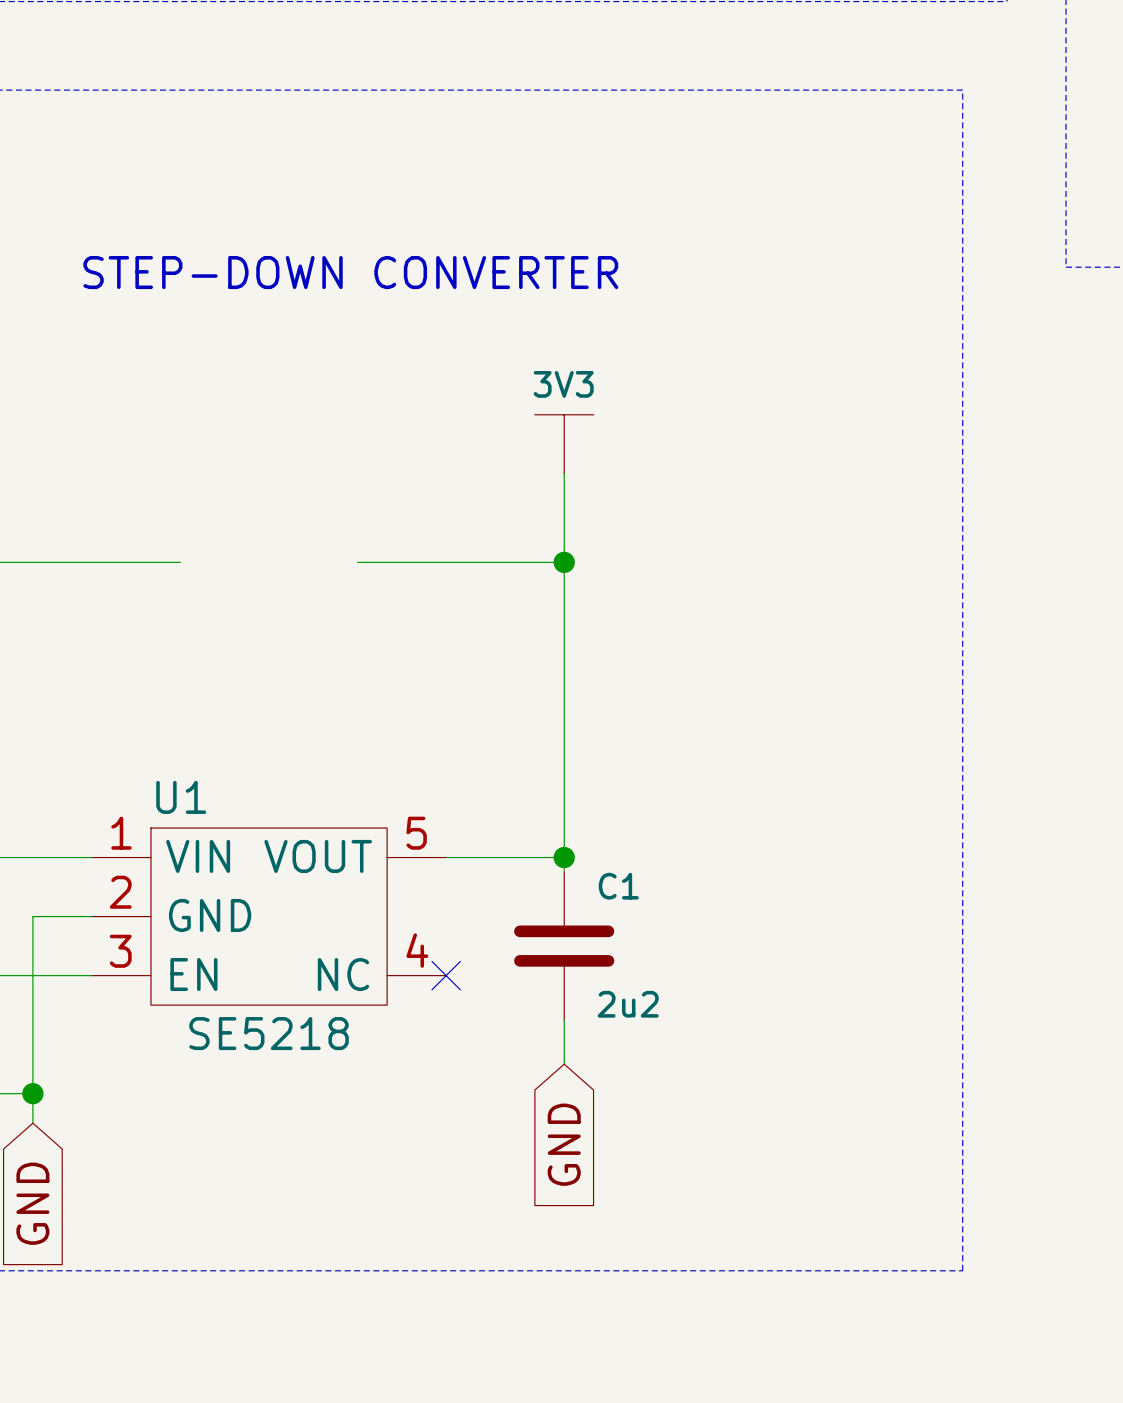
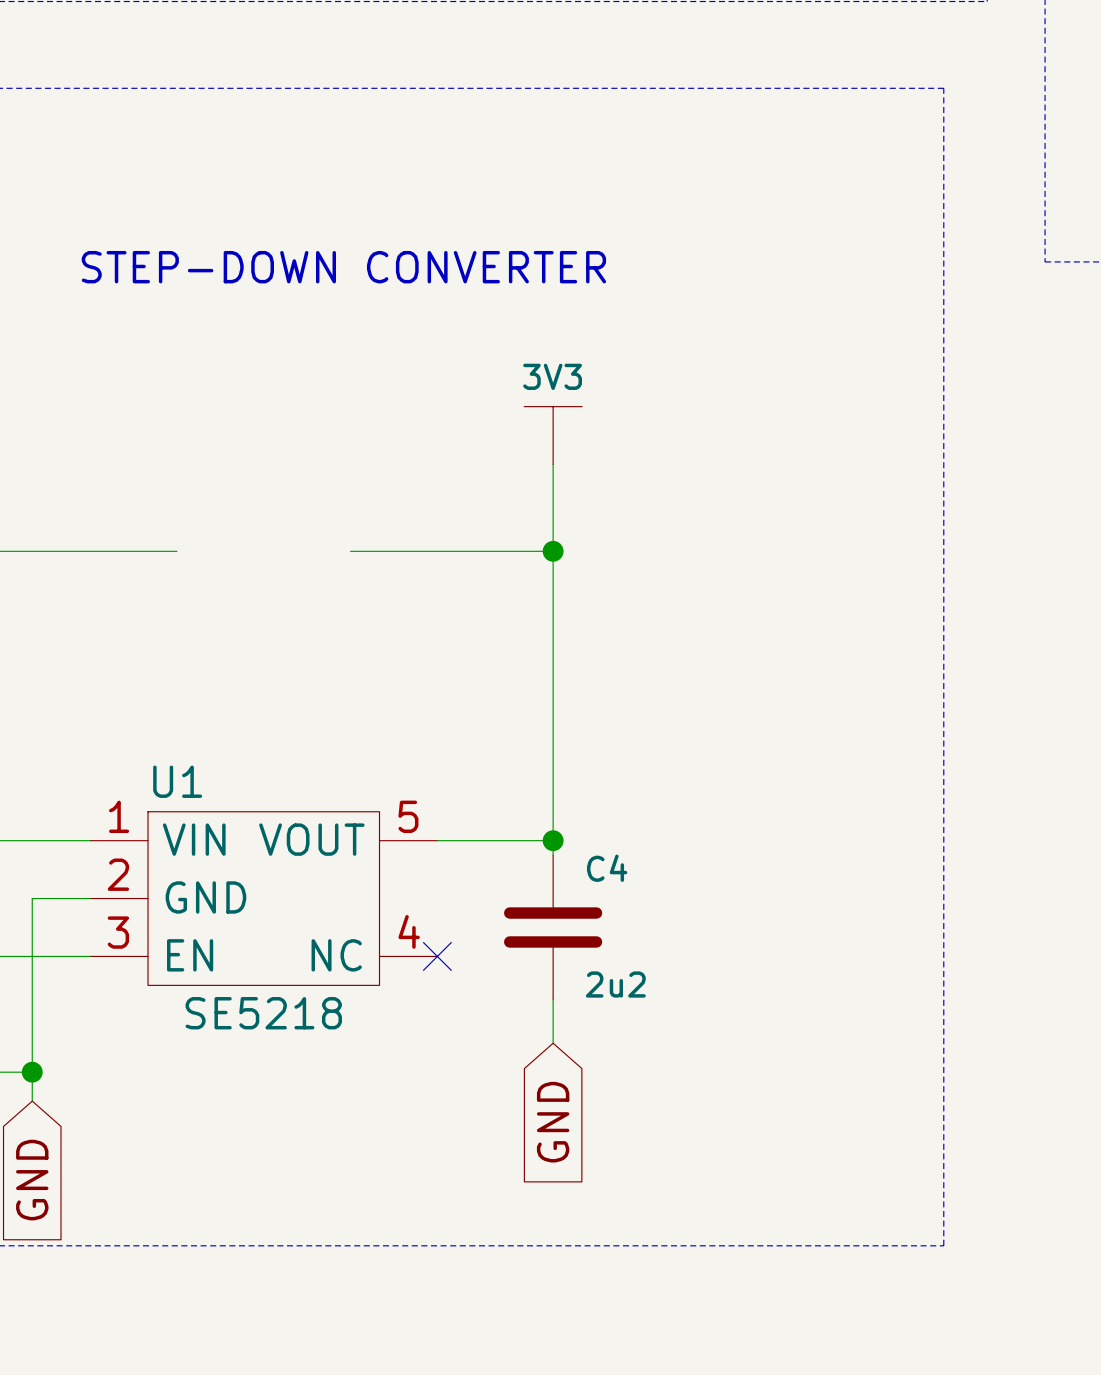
C1 name: C1 (618, 886) -> C4 (607, 868)

